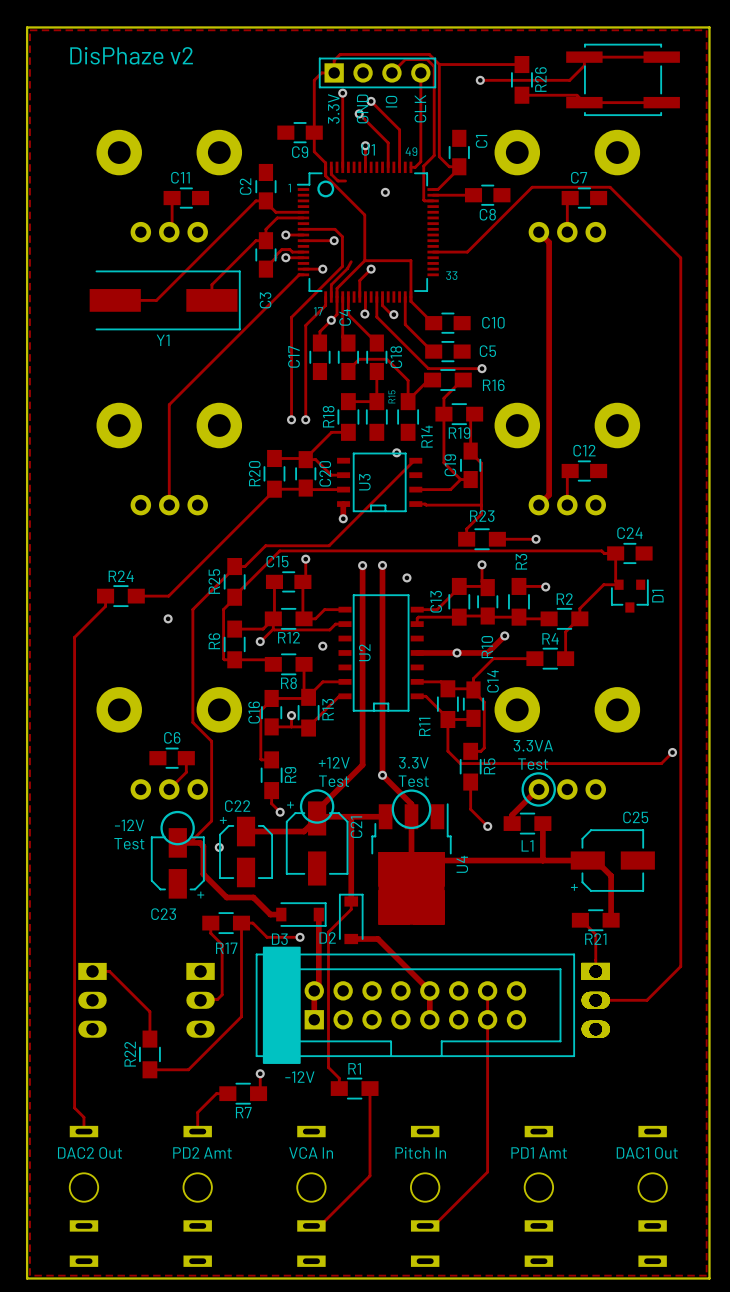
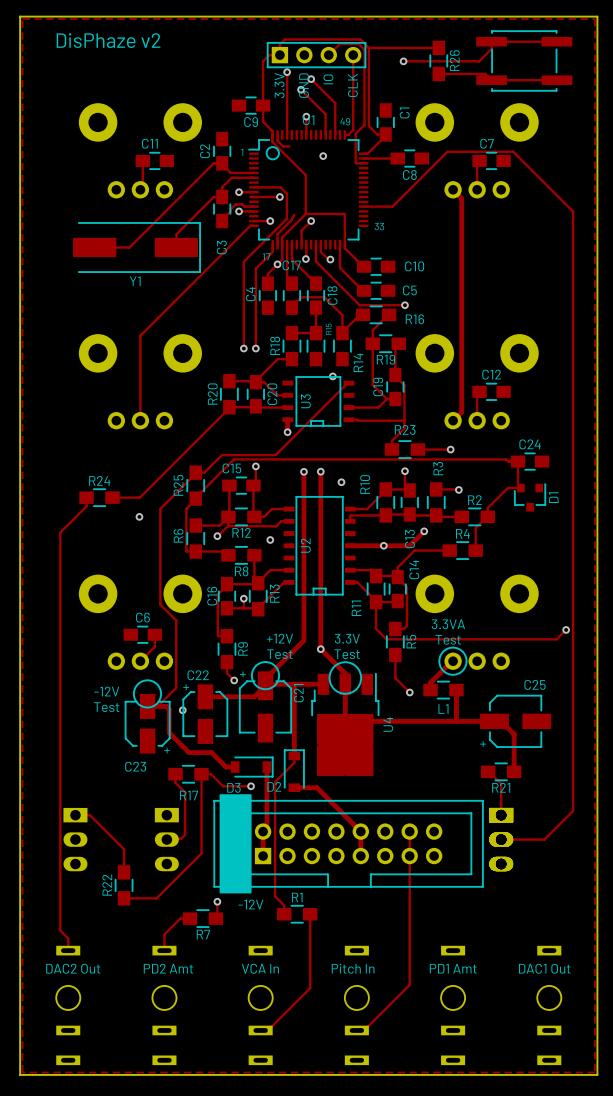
C4 name position: C4 (345, 317) -> C4 (250, 294)
C17 name rotation: 0° (293, 356) -> 90° clockwise (291, 265)
C17 name position: C17 (293, 356) -> C17 (291, 265)
C13 name position: C13 (436, 601) -> C13 (409, 538)
R10 name position: R10 (487, 647) -> R10 (365, 484)

